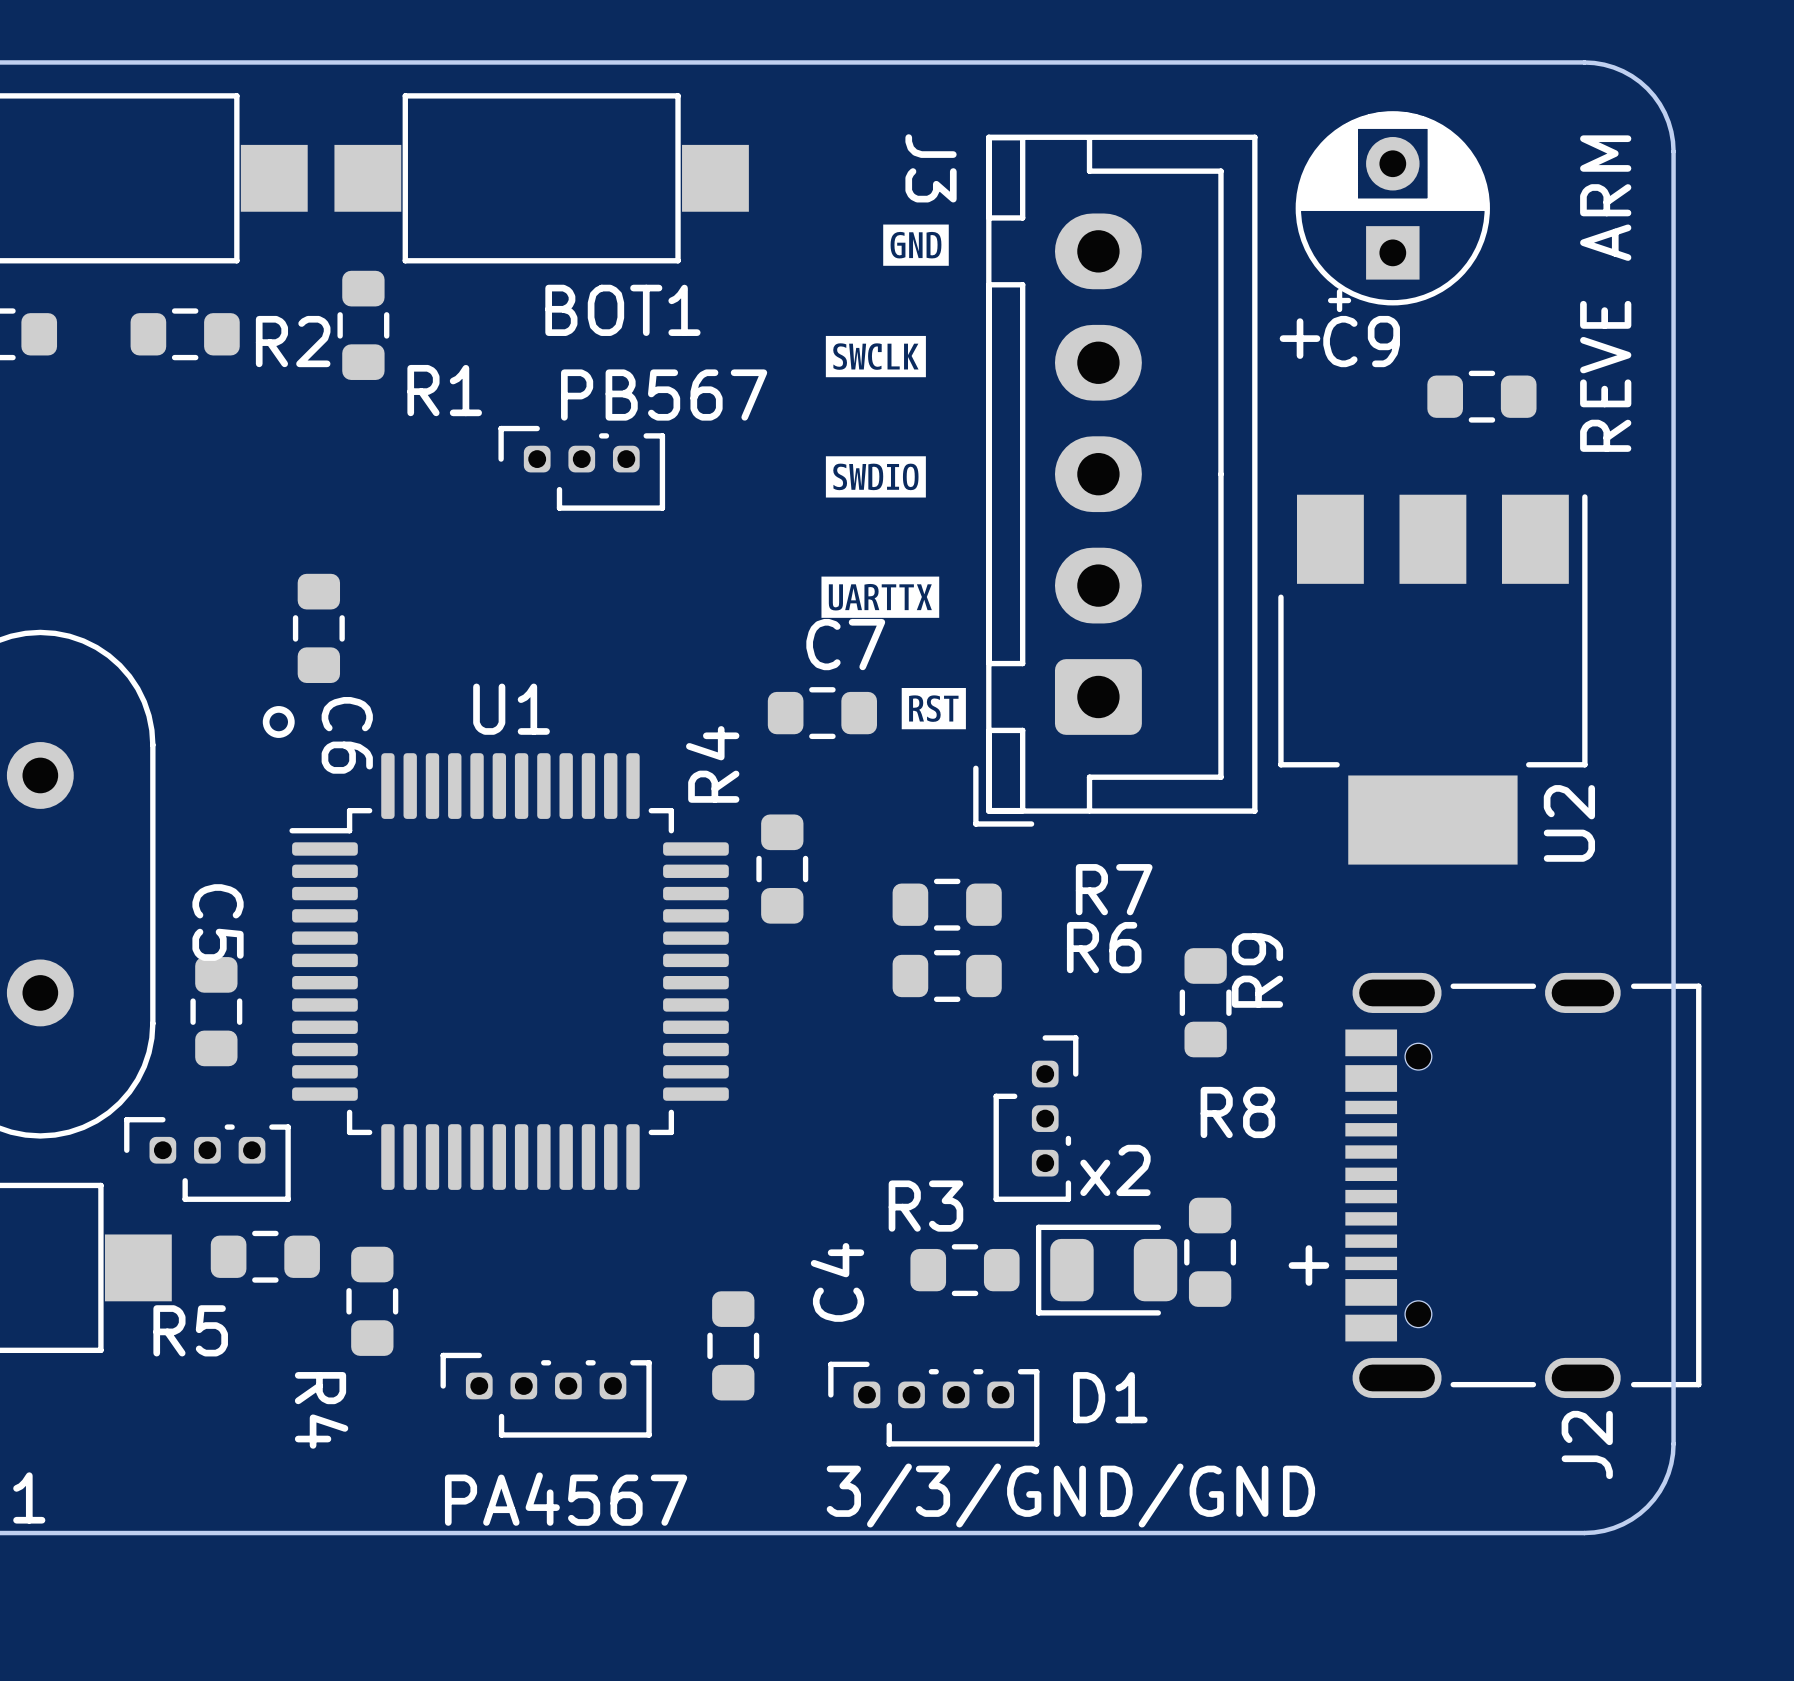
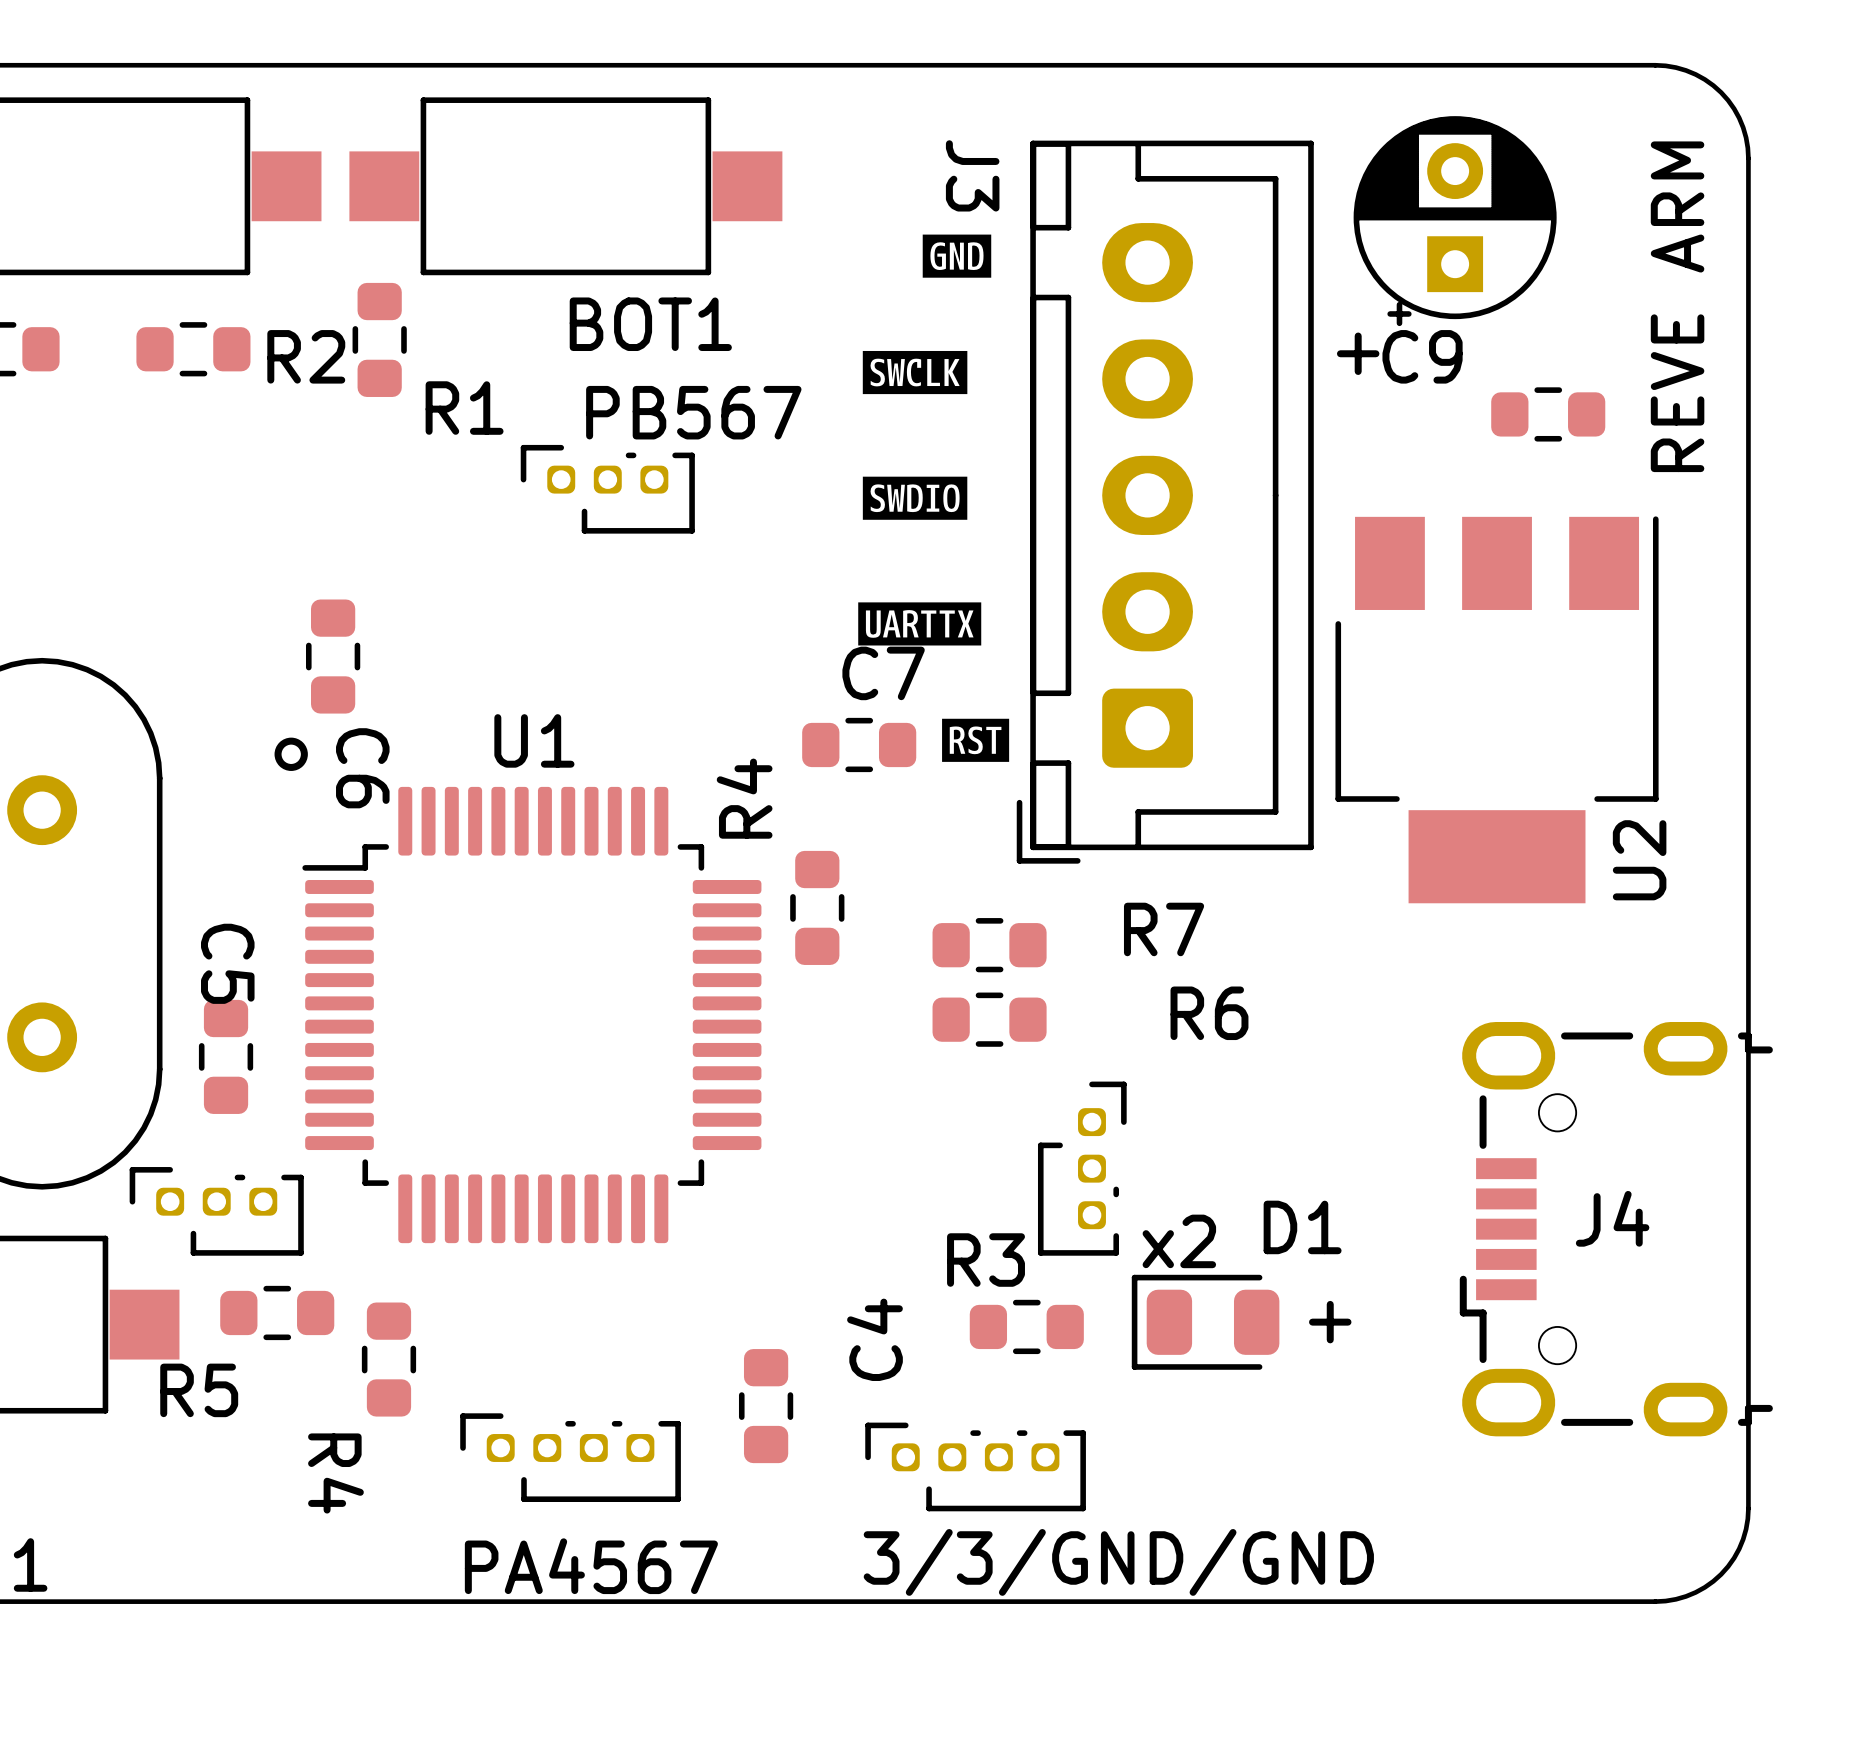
R6 name position: R6 (1104, 947) -> R6 (1209, 1013)
R9: (1205, 1002) -> none
x2 name position: x2 (1115, 1170) -> x2 (1179, 1241)
J4: none -> (1616, 1229)
J2: (1523, 1185) -> none
R8: (1210, 1252) -> none
text position: + (1308, 1265) -> + (1330, 1322)
R3 position: (965, 1270) -> (1026, 1326)
D1 position: (1106, 1270) -> (1205, 1322)
D1 name position: D1 (1110, 1397) -> D1 (1302, 1227)

